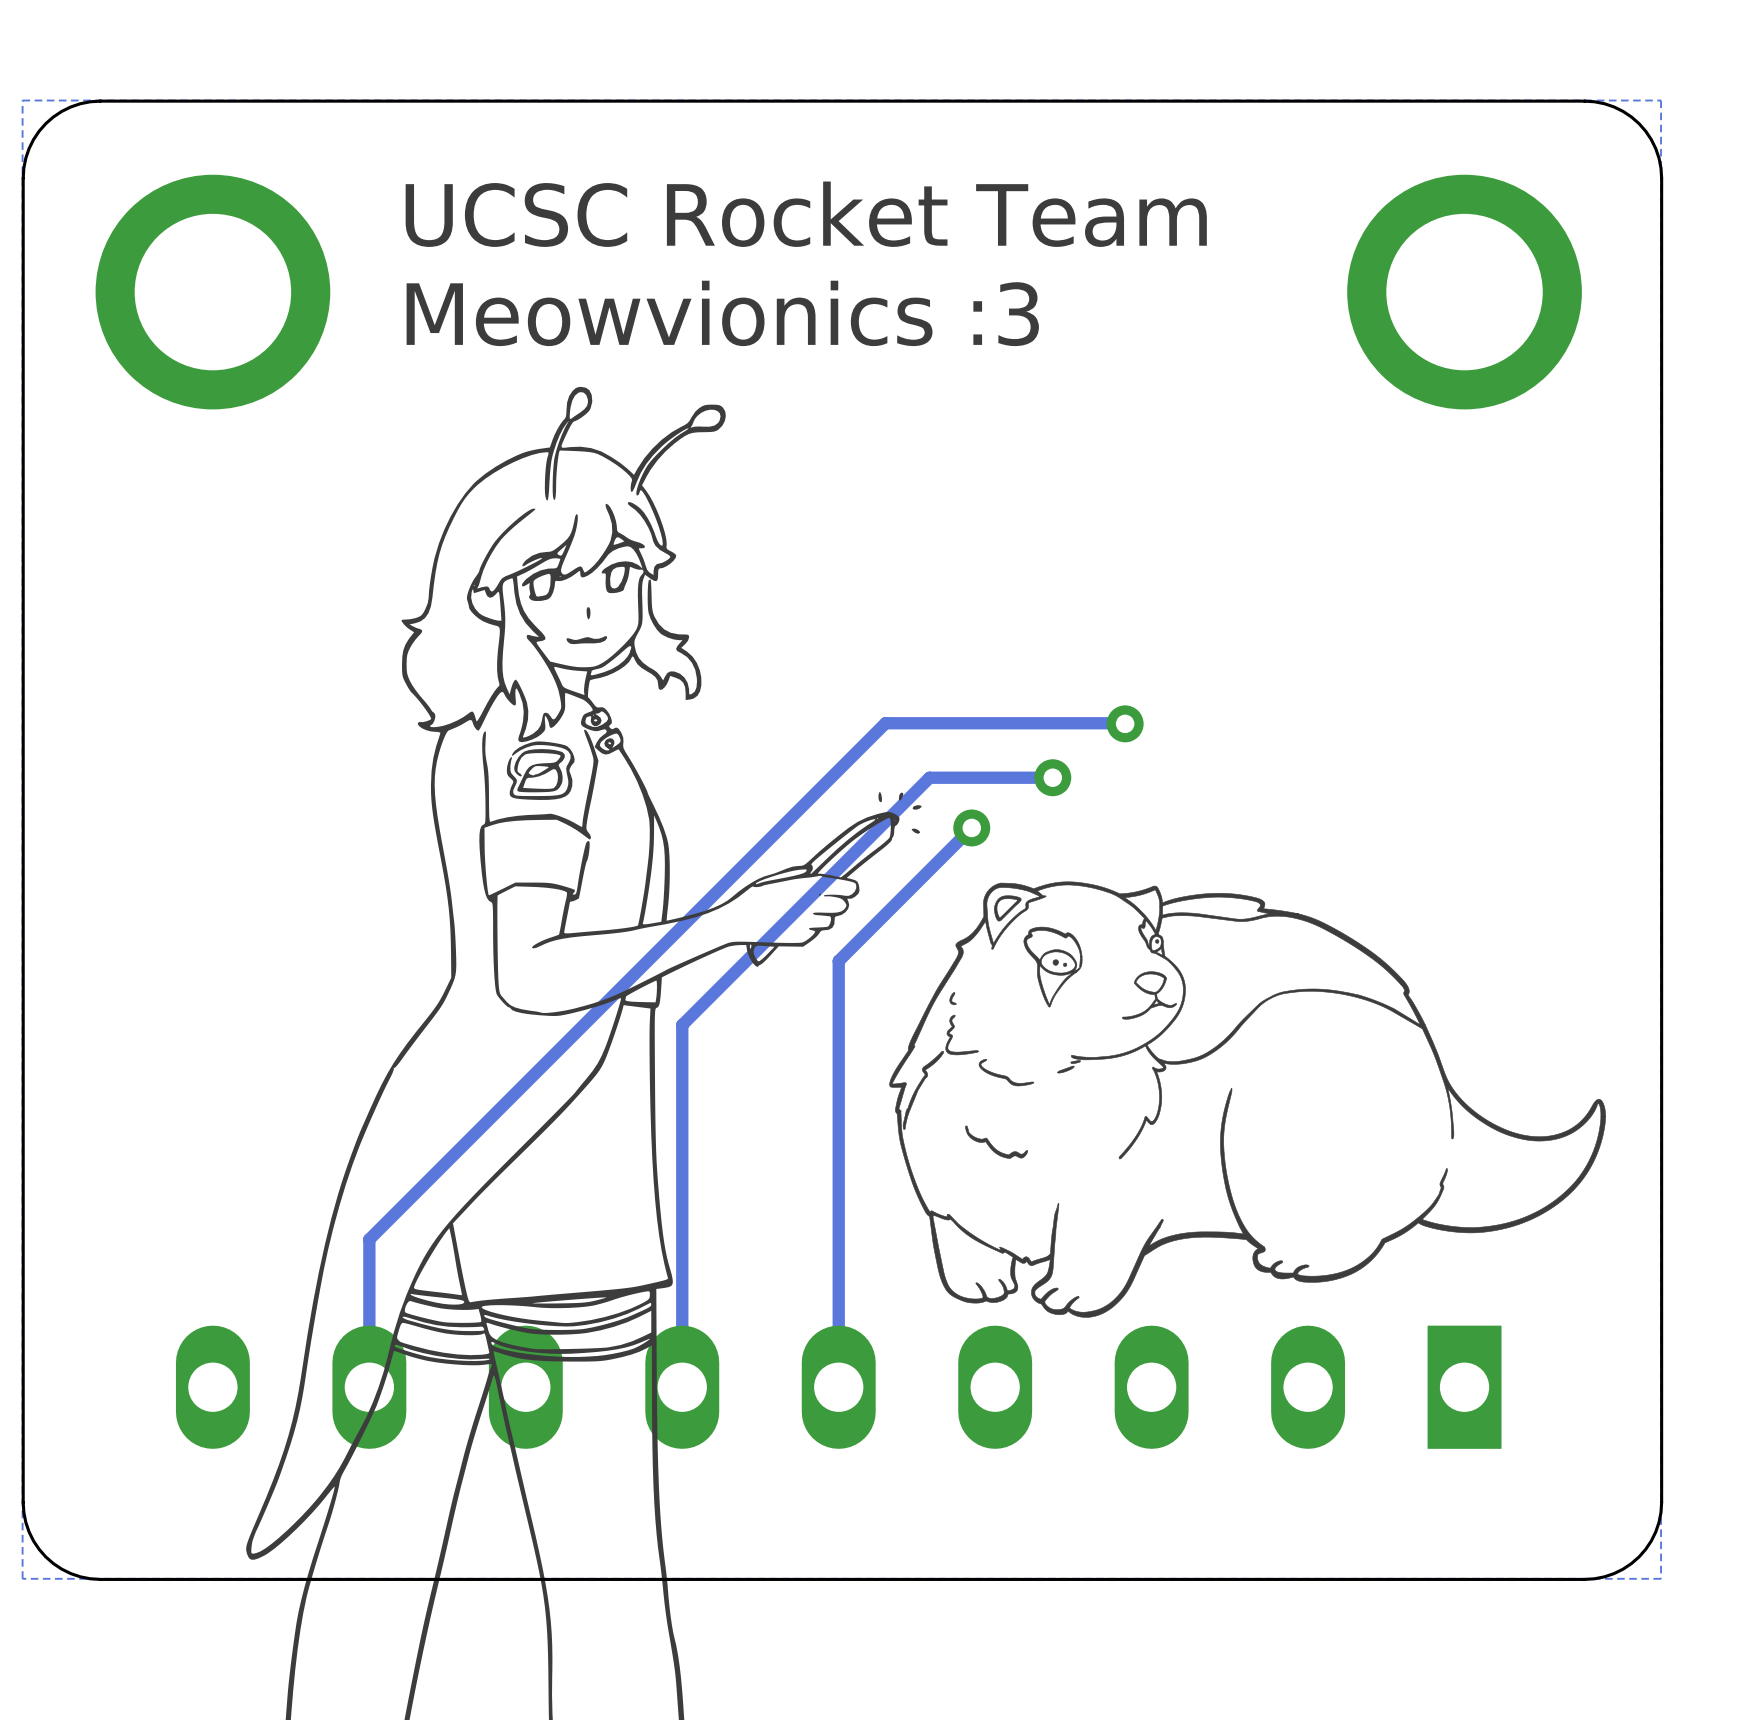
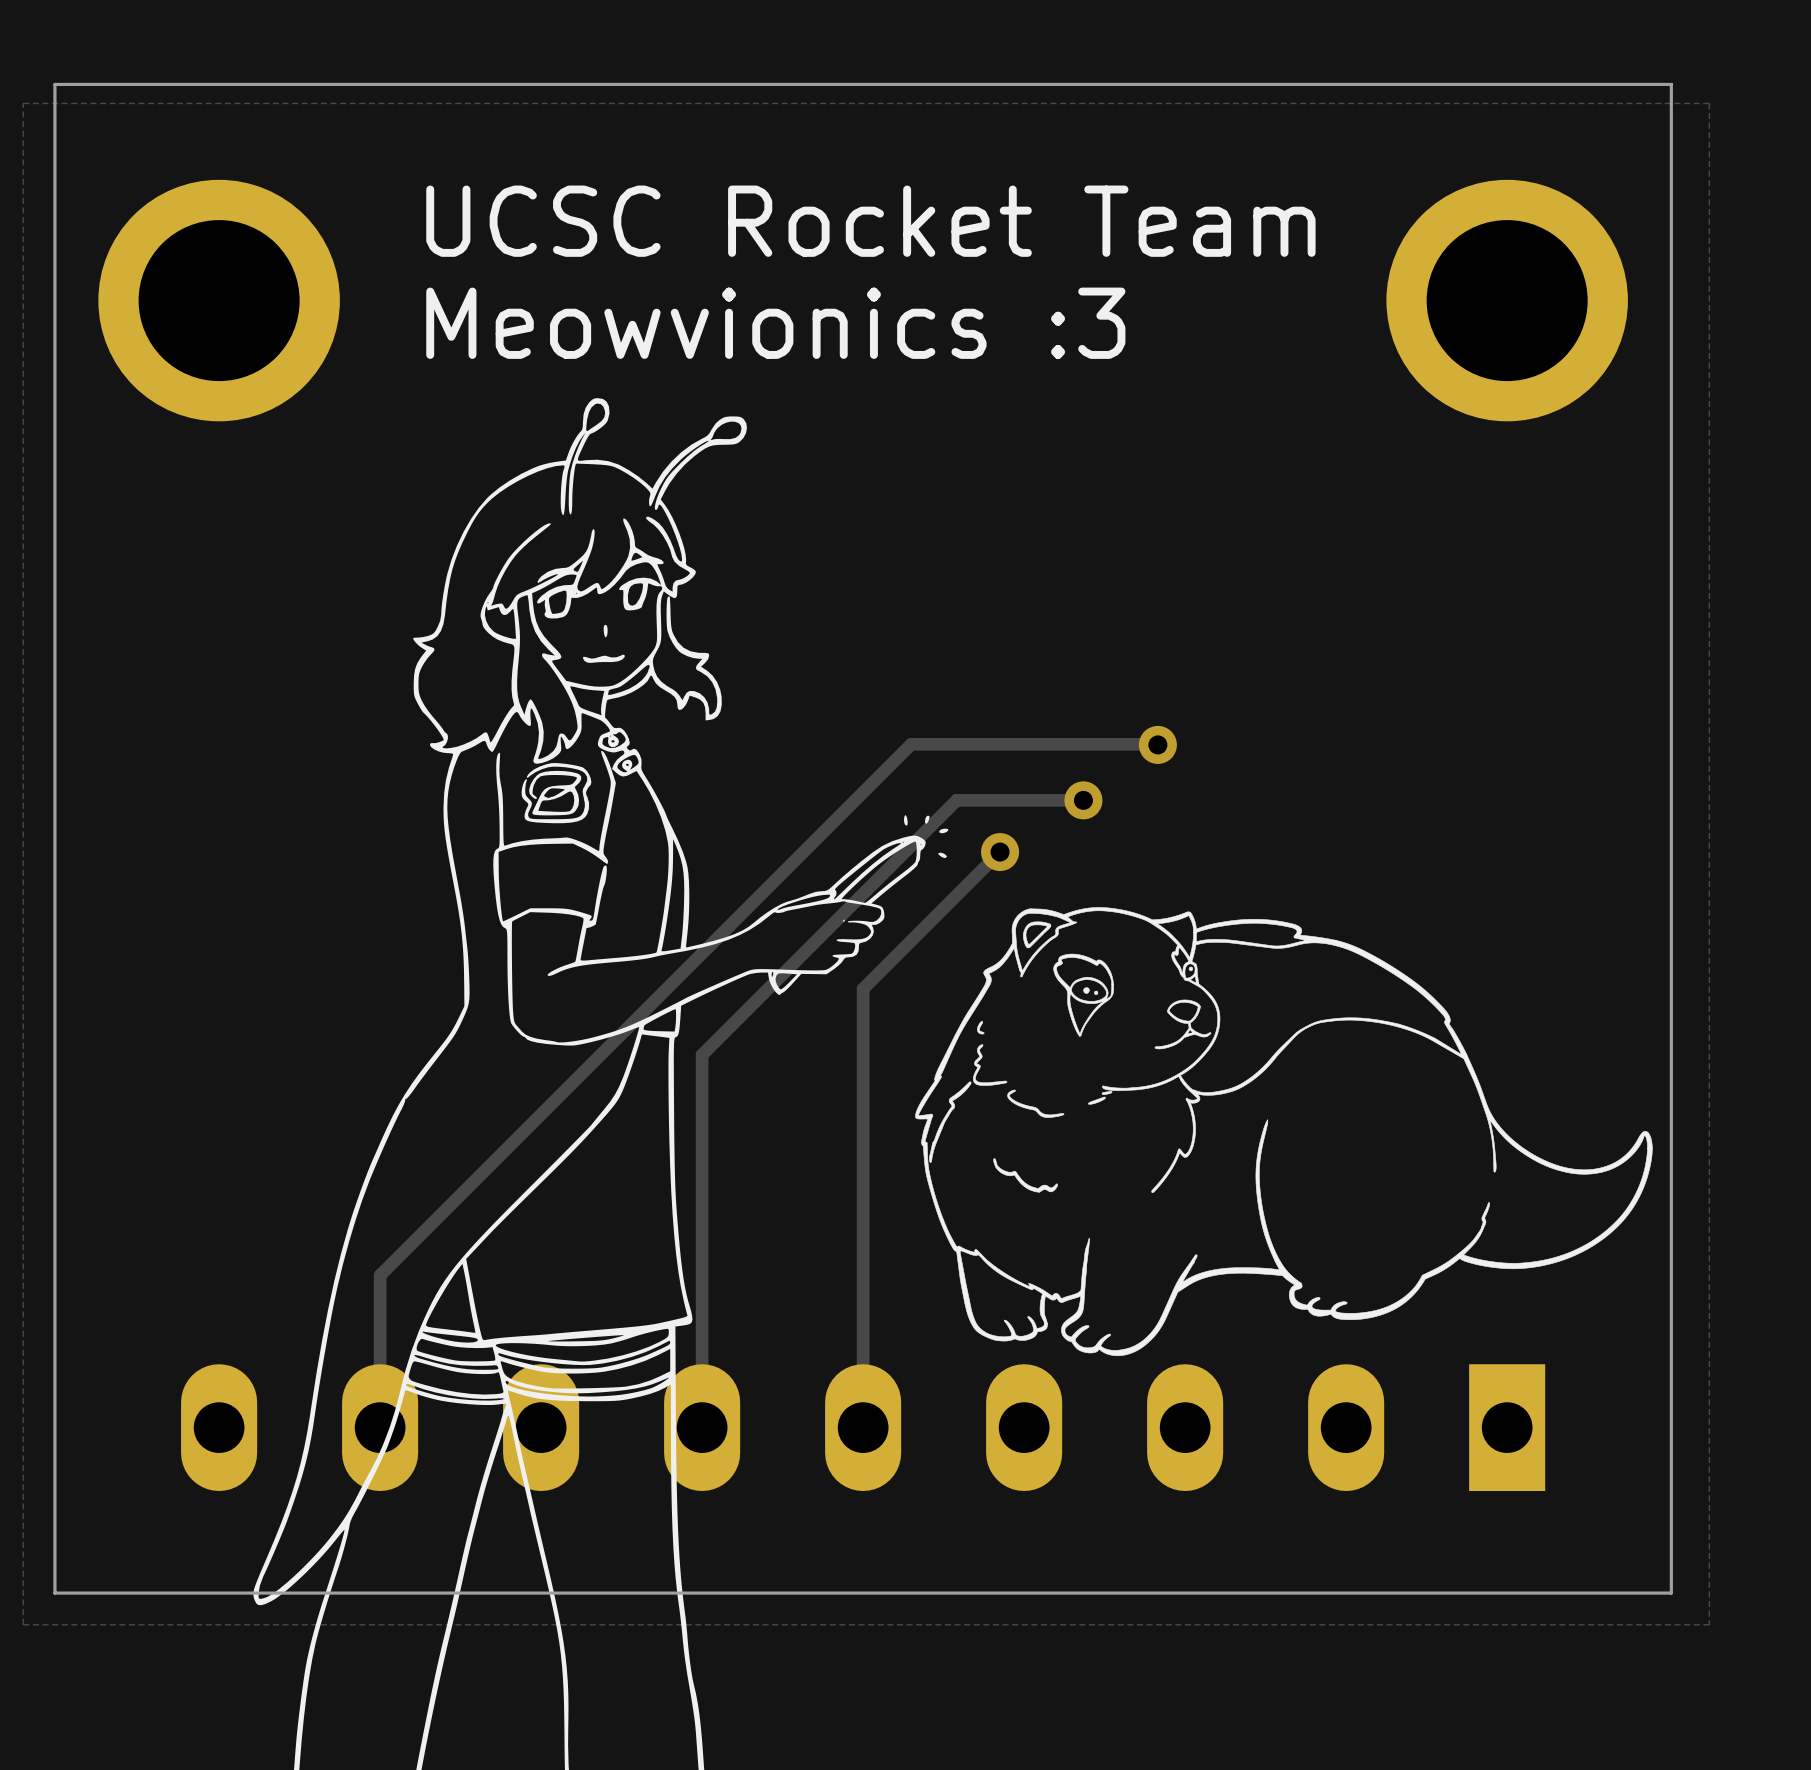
board edge: (1584, 101) (100, 101) (70, 106) (45, 123) (29, 148) (23, 178) (23, 1502) (29, 1531) (45, 1556) (70, 1573) (100, 1579) (1584, 1579) (1614, 1573) (1639, 1556) (1655, 1531) (1661, 1502) (1661, 178) (1655, 148) (1639, 123) (1614, 106) (1584, 101) -> (1671, 84) (1671, 1593) (54, 1593) (54, 84) (1671, 84)

